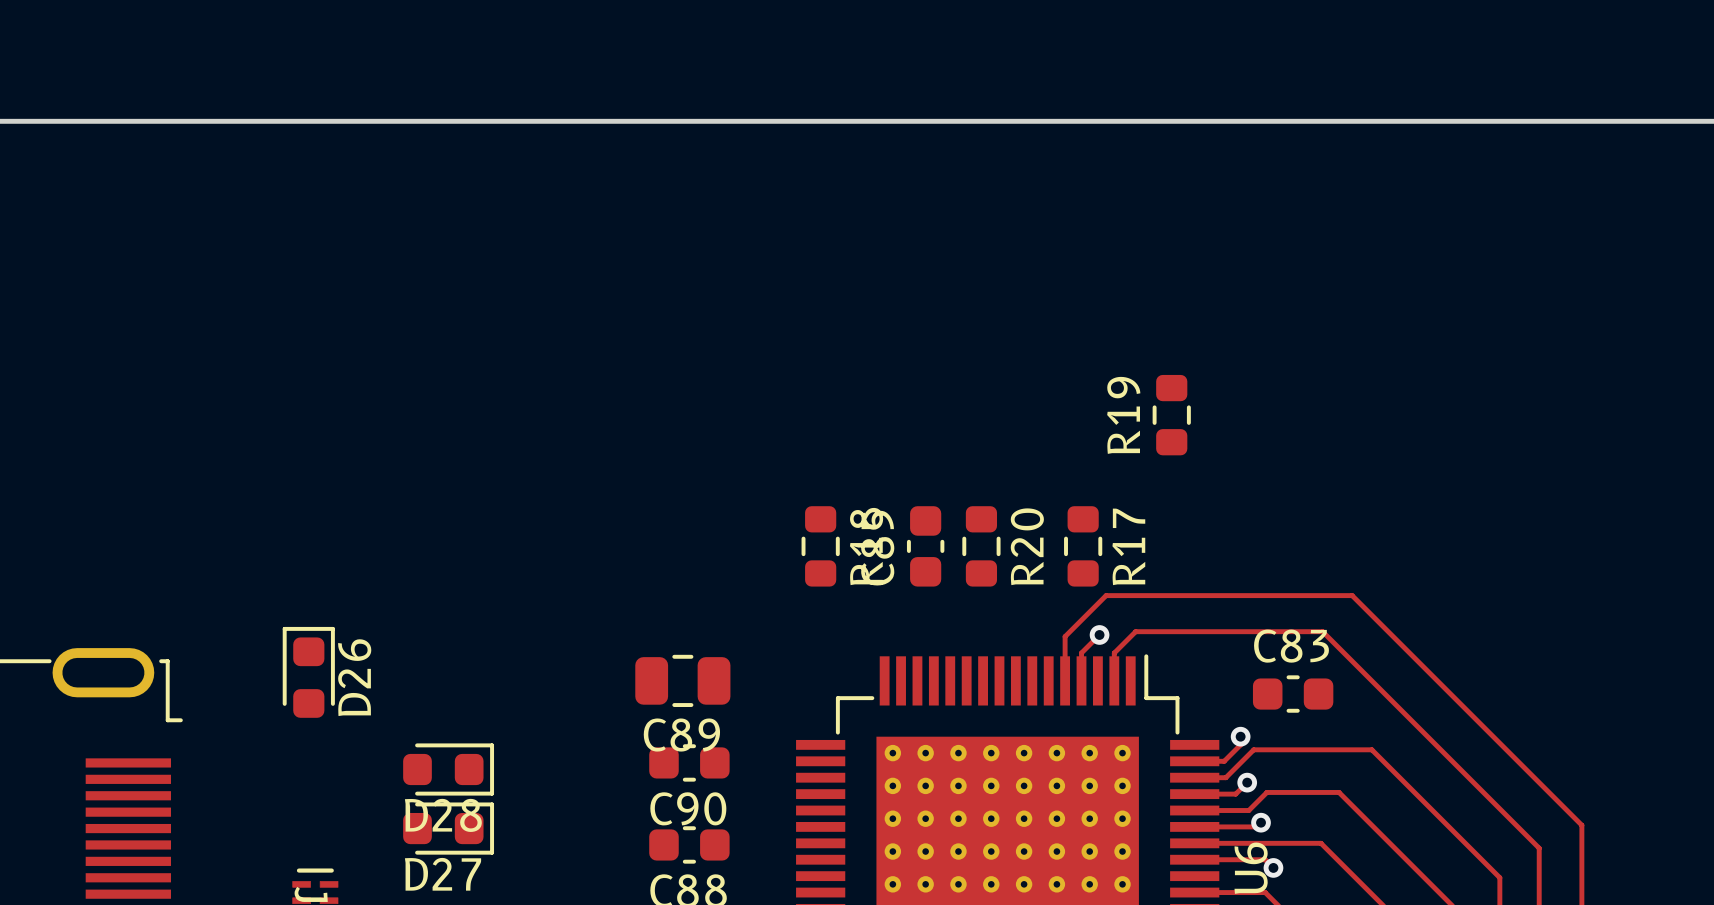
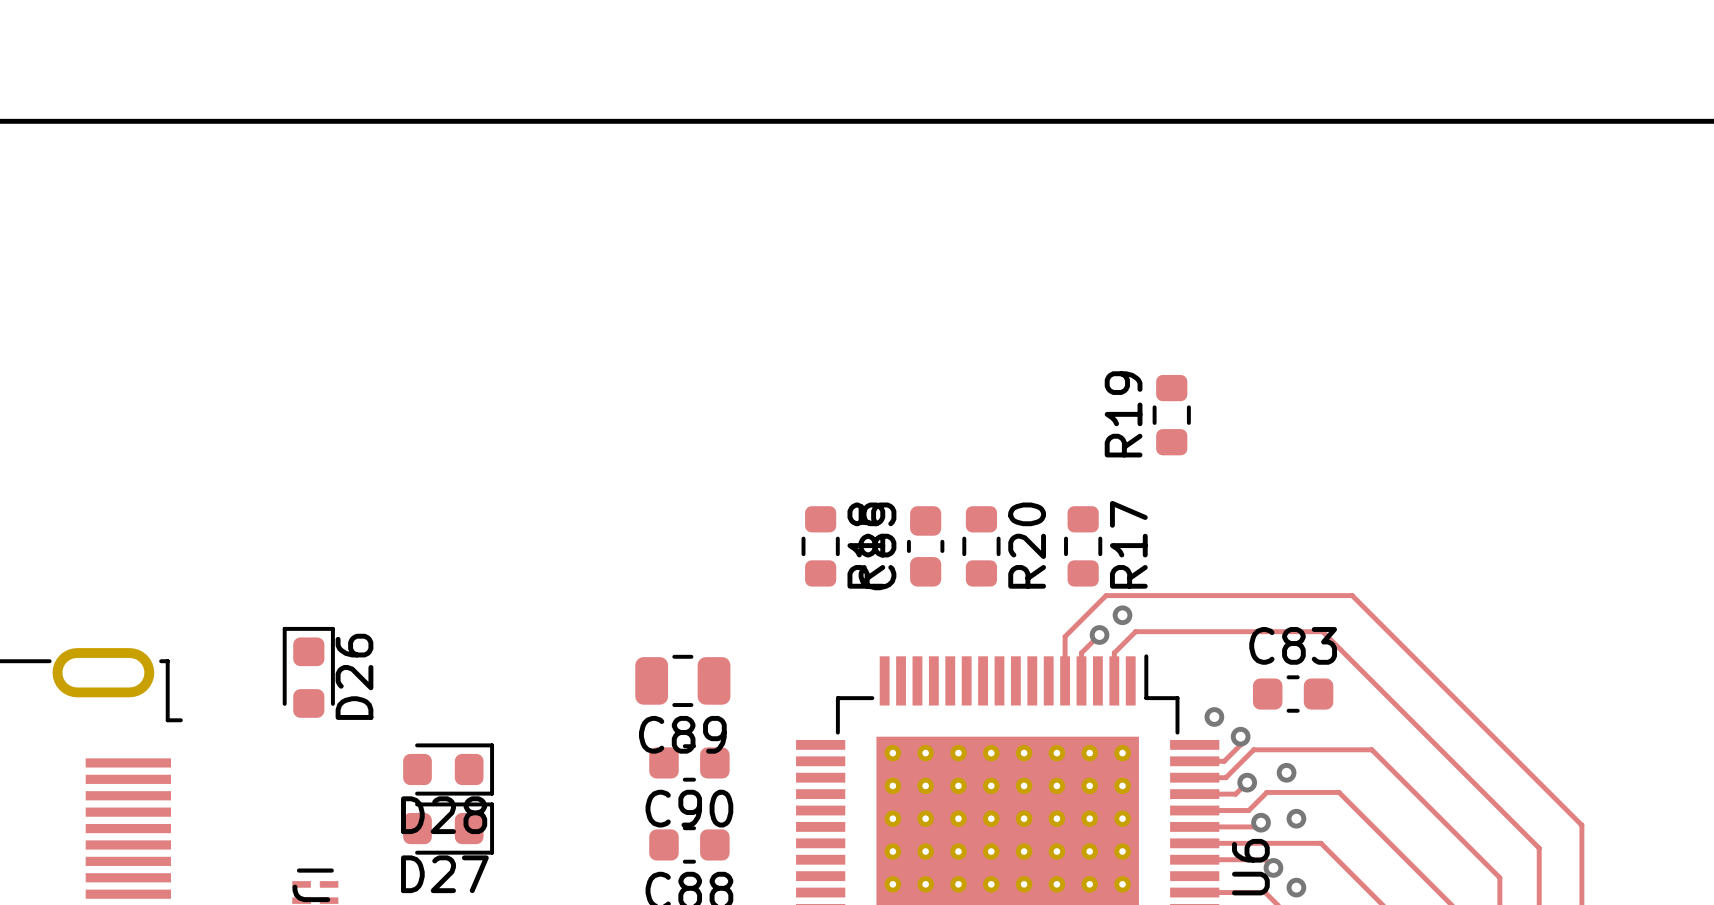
via: none -> (1122, 615)
via: none -> (1214, 717)
via: none -> (1286, 772)
via: none -> (1296, 818)
via: none -> (1296, 887)

